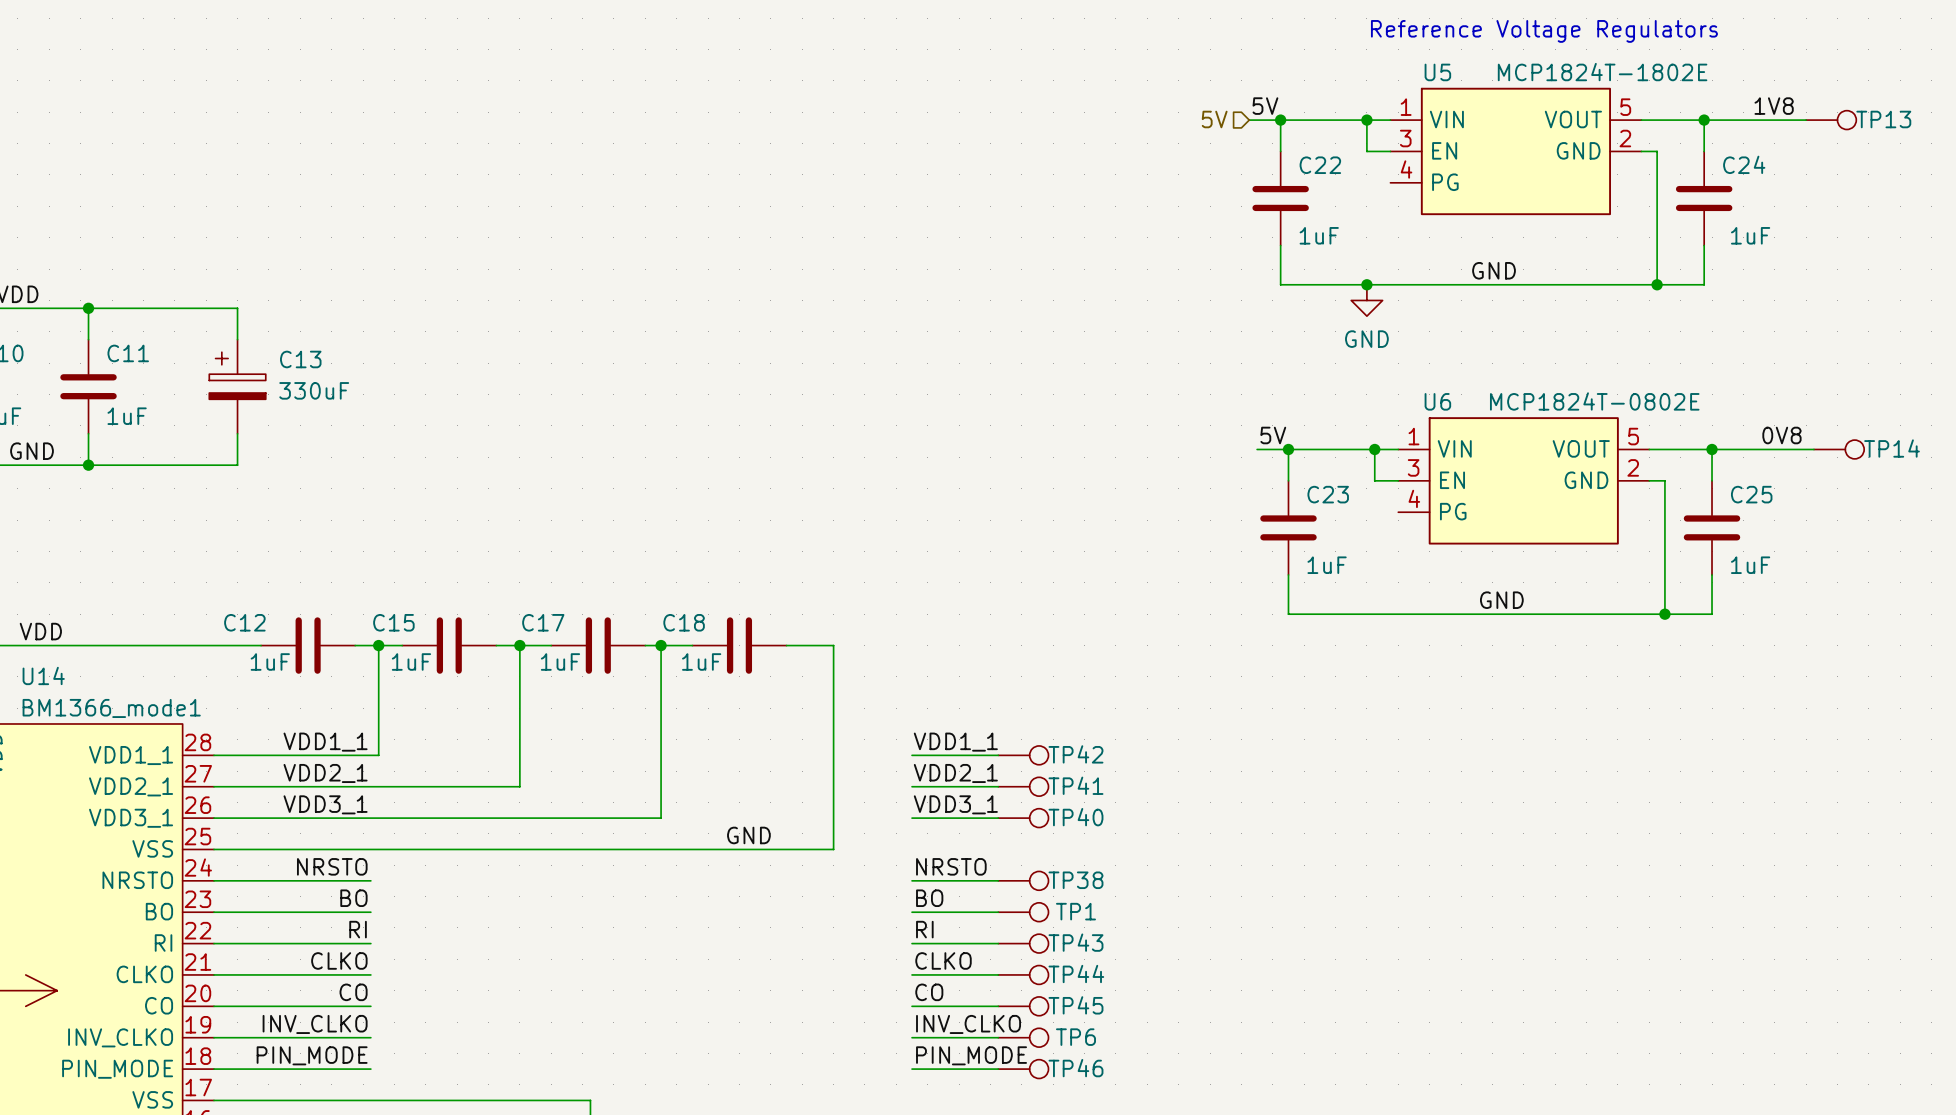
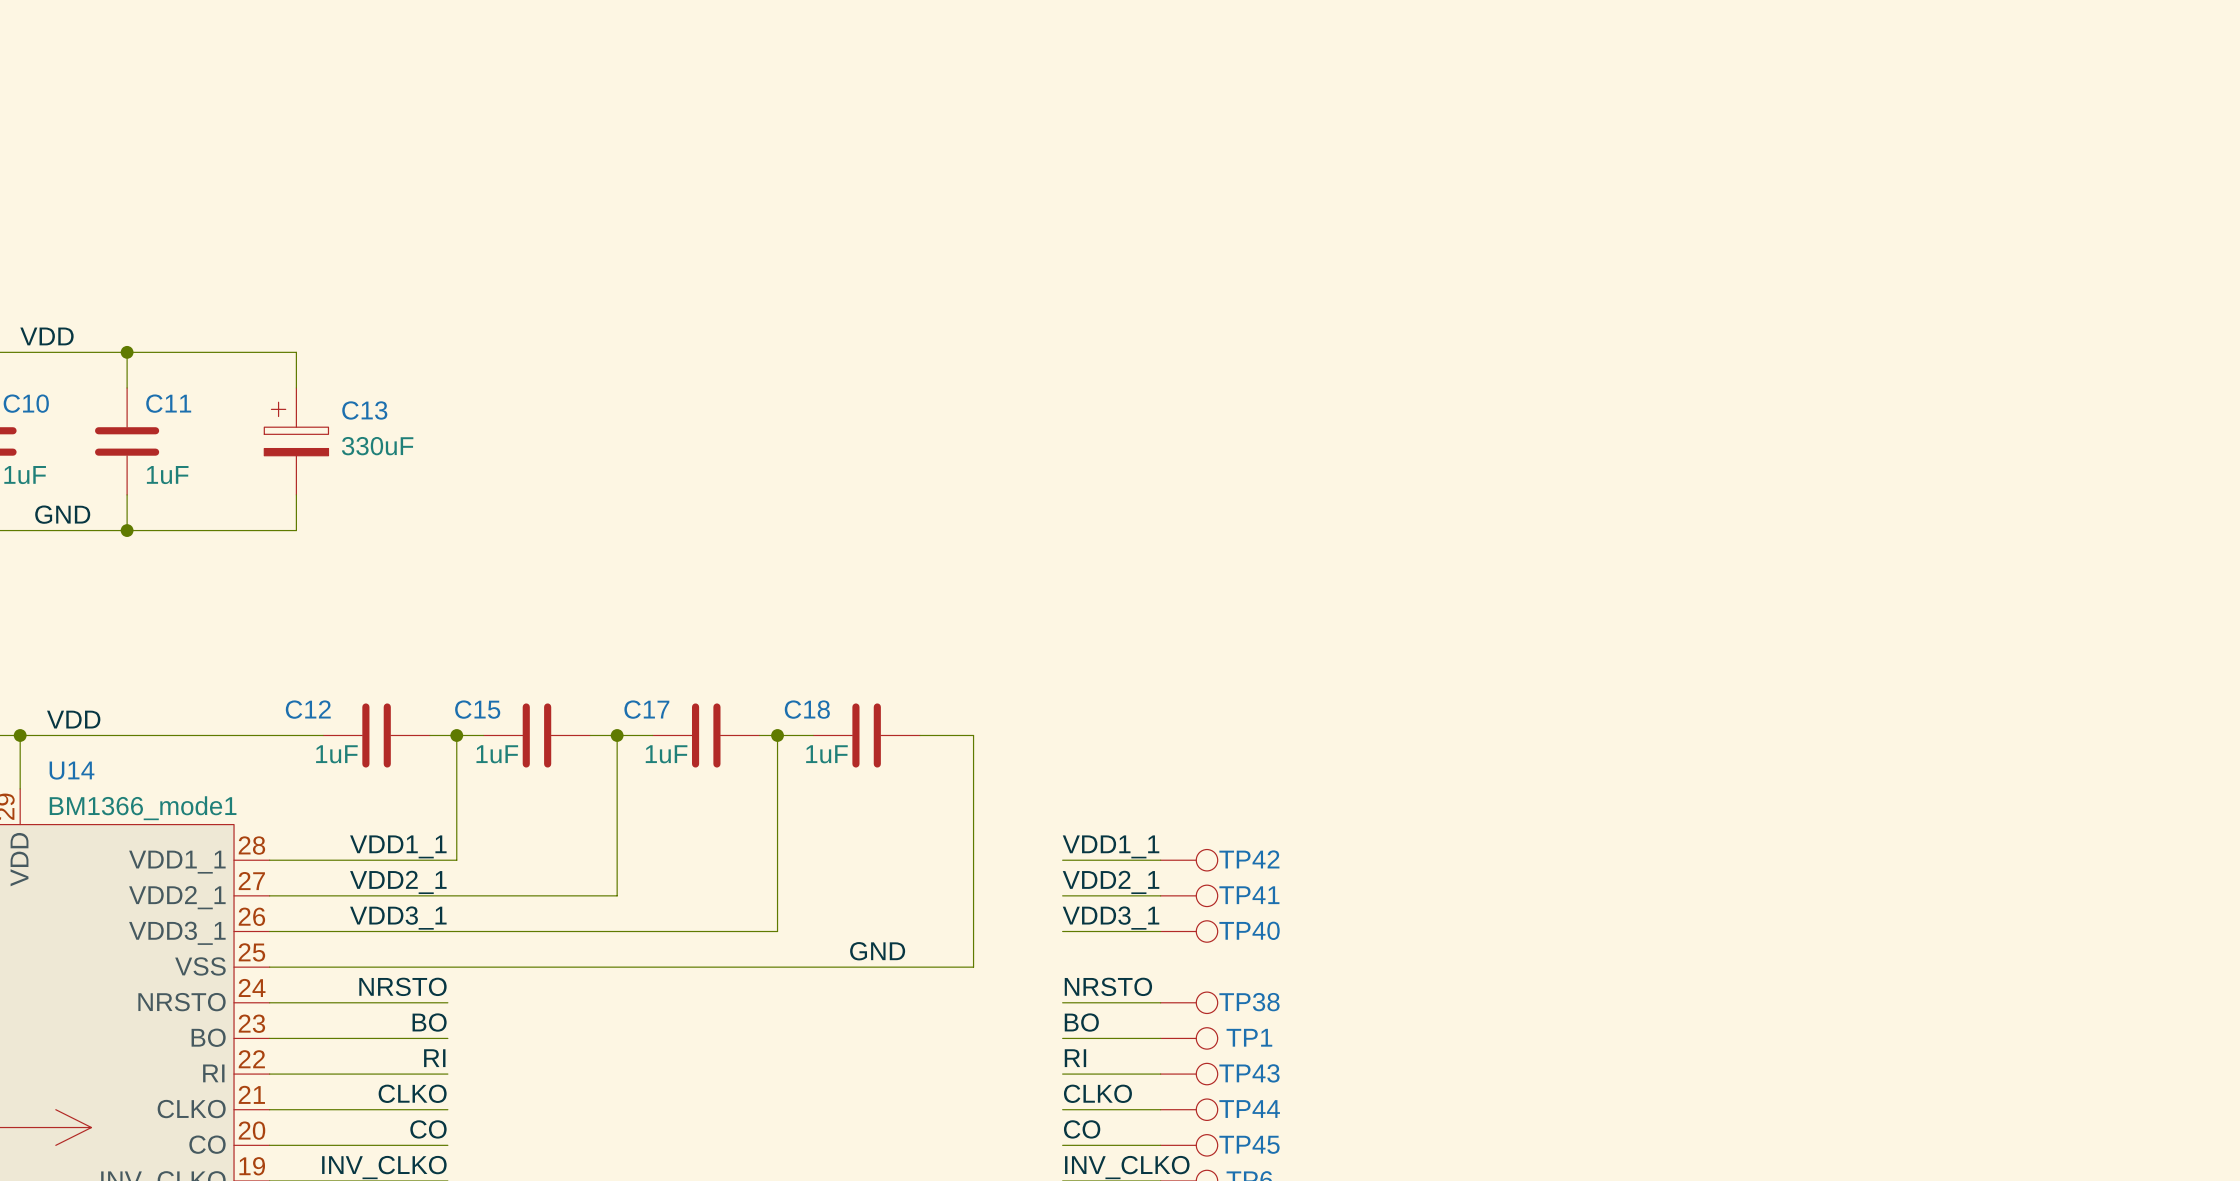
text: Reference Voltage Regulators (1544, 31) -> none
label: 5V (1265, 106) -> none
label: 1V8 (1774, 106) -> none
hierarchical label: 5V (1214, 119) -> none
wire: (1249, 120) (1390, 120) -> none
wire: (1280, 120) (1280, 151) -> none
junction: (1280, 120) -> none
wire: (1366, 120) (1366, 151) (1390, 151) -> none
junction: (1366, 120) -> none
wire: (1641, 120) (1806, 120) -> none
wire: (1704, 120) (1704, 151) -> none
junction: (1704, 120) -> none
TP13: (1831, 120) -> none
U5: MCP1824T-1802E (1515, 151) -> none
wire: (1641, 151) (1657, 151) (1657, 284) -> none
C22: 1uF (1280, 198) -> none
C24: 1uF (1704, 198) -> none
wire: (1280, 245) (1280, 284) (1704, 284) (1704, 245) -> none
label: GND (1494, 270) -> none
junction: (1366, 284) -> none
junction: (1657, 284) -> none
power symbol: GND (1366, 300) -> none
label: 5V (1273, 435) -> none
label: 0V8 (1781, 435) -> none
wire: (1257, 449) (1398, 449) -> none
wire: (1288, 449) (1288, 480) -> none
junction: (1288, 449) -> none
wire: (1374, 449) (1374, 480) (1398, 480) -> none
junction: (1374, 449) -> none
wire: (1649, 449) (1813, 449) -> none
wire: (1712, 449) (1712, 480) -> none
junction: (1712, 449) -> none
TP14: (1839, 449) -> none
U6: MCP1824T-0802E (1523, 480) -> none
wire: (1649, 480) (1664, 480) (1664, 614) -> none
C23: 1uF (1288, 527) -> none
C25: 1uF (1712, 527) -> none
wire: (1288, 574) (1288, 614) (1712, 614) (1712, 574) -> none
label: GND (1501, 600) -> none
junction: (1664, 614) -> none

